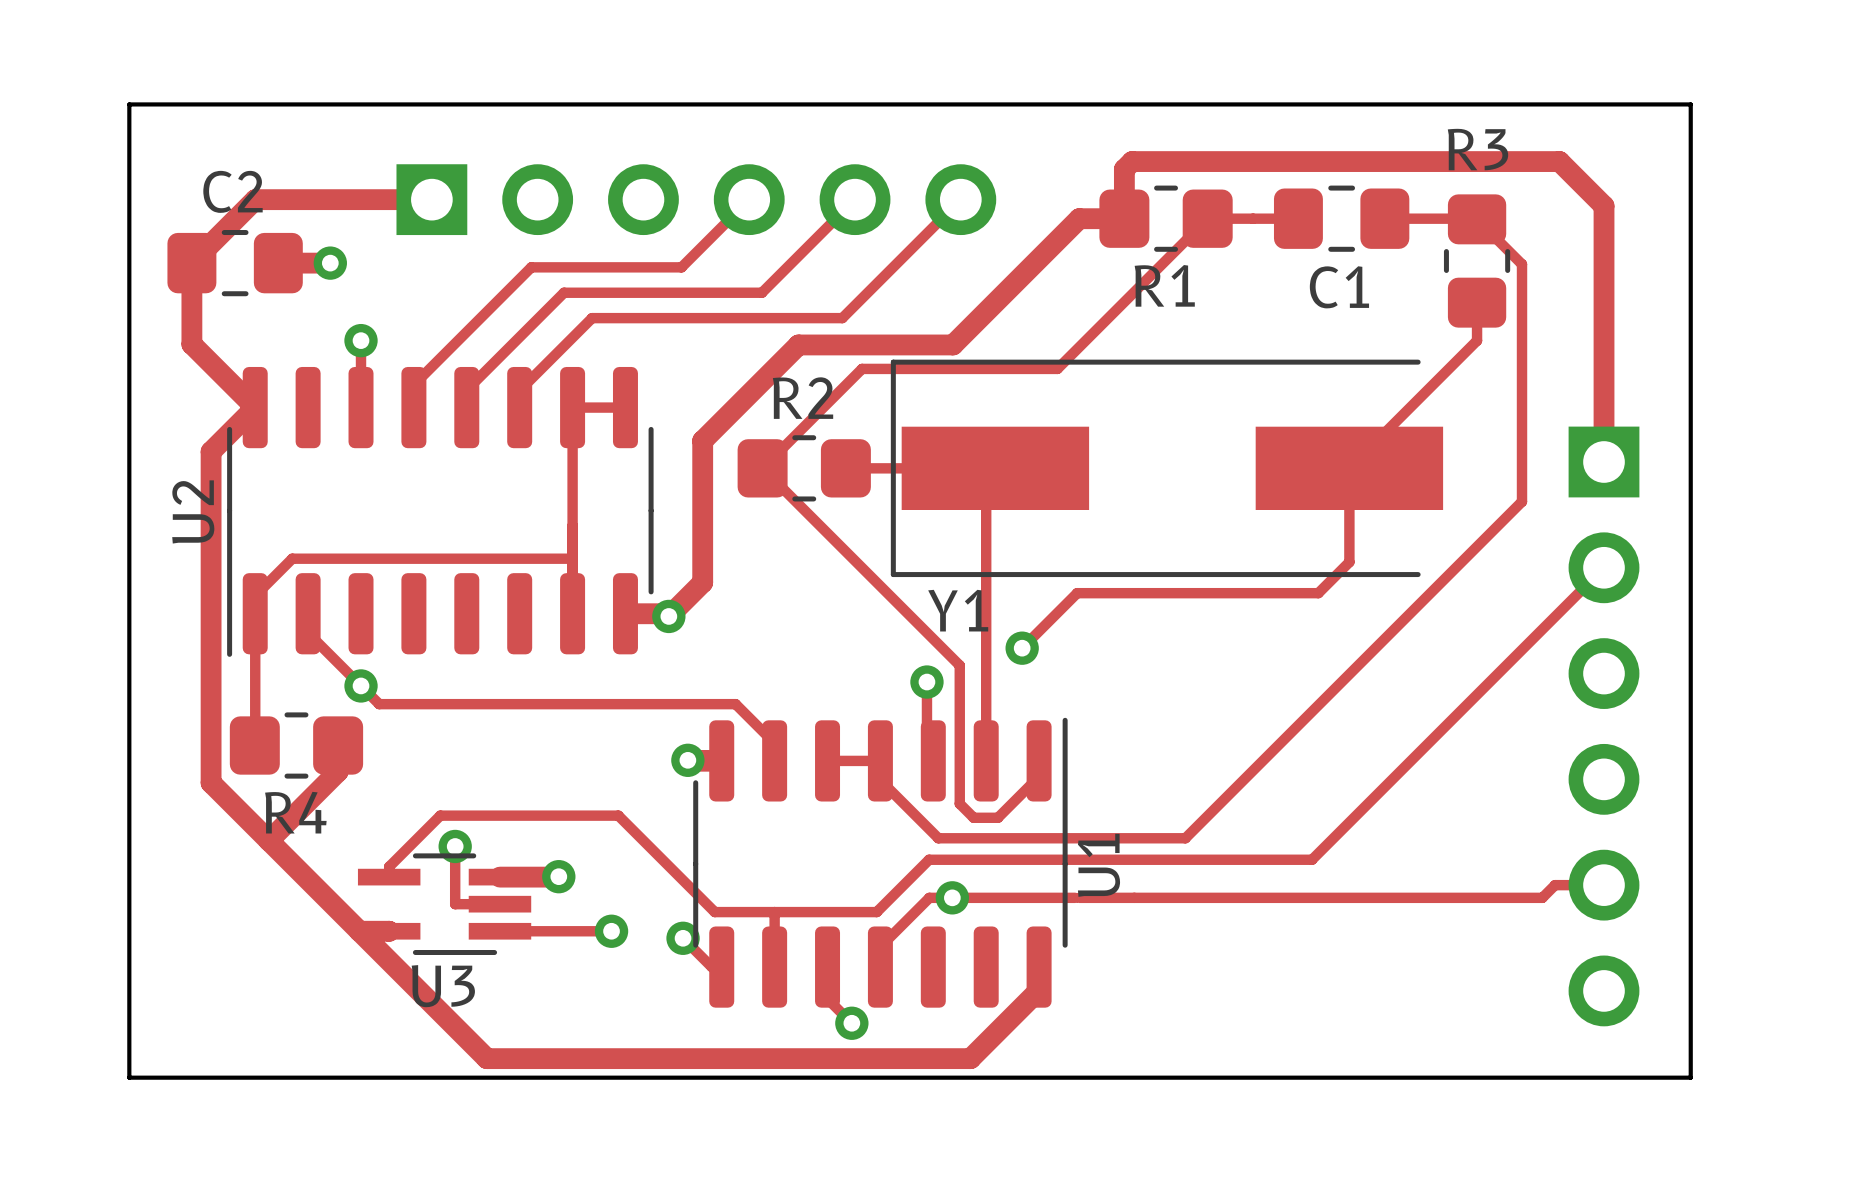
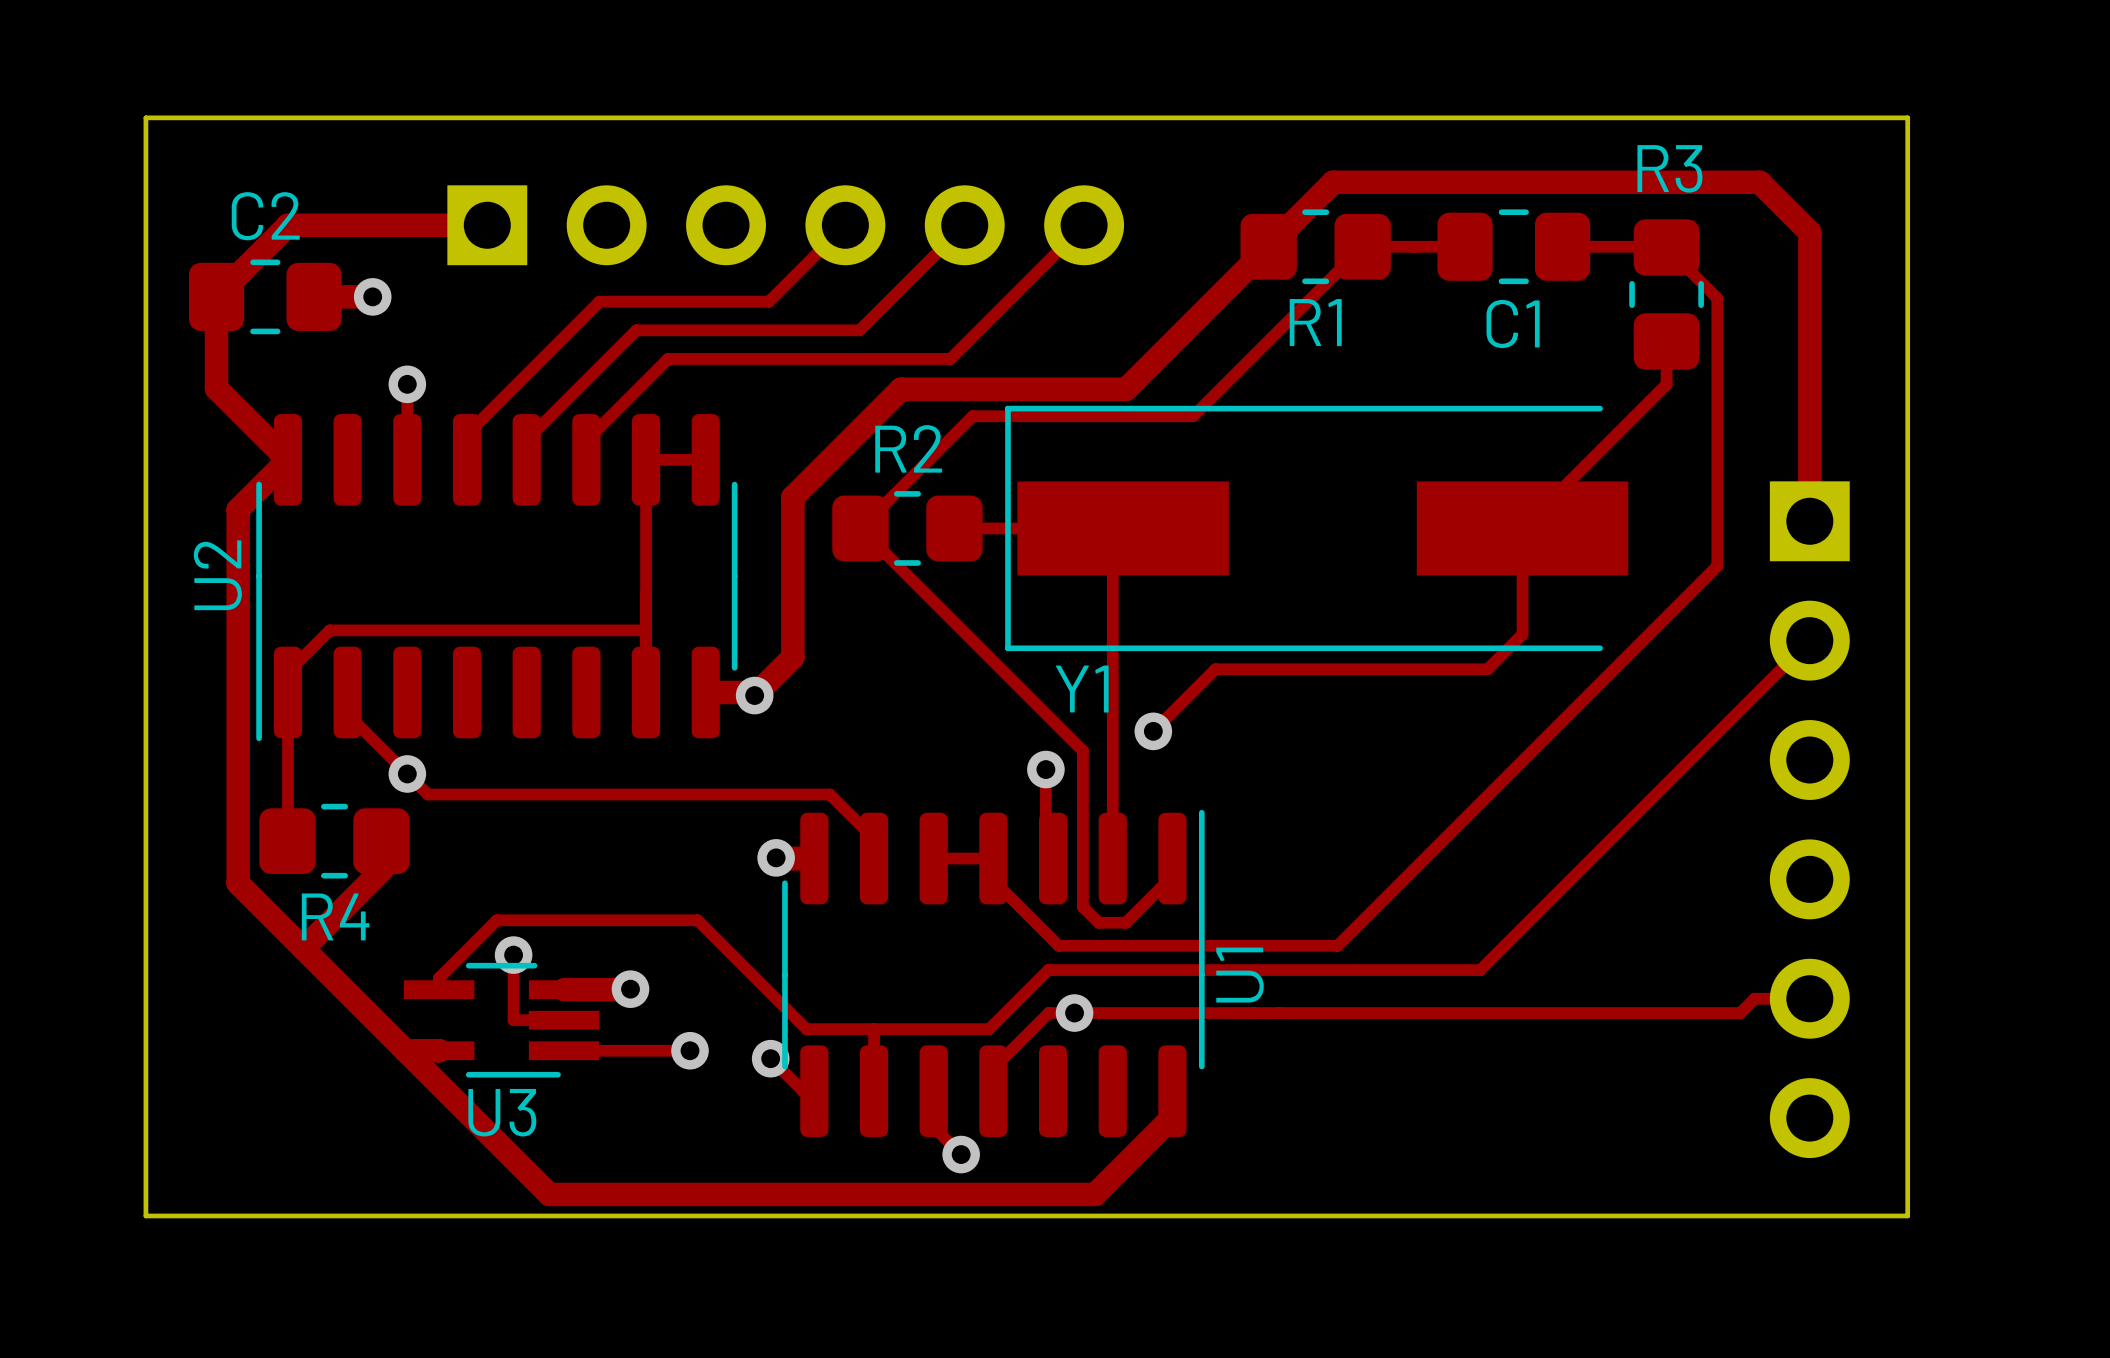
track: (1181, 161) (1132, 161) (1124, 169) (1124, 218) (1079, 218) (953, 344) -> (1333, 182) (1126, 389) (1075, 389)

